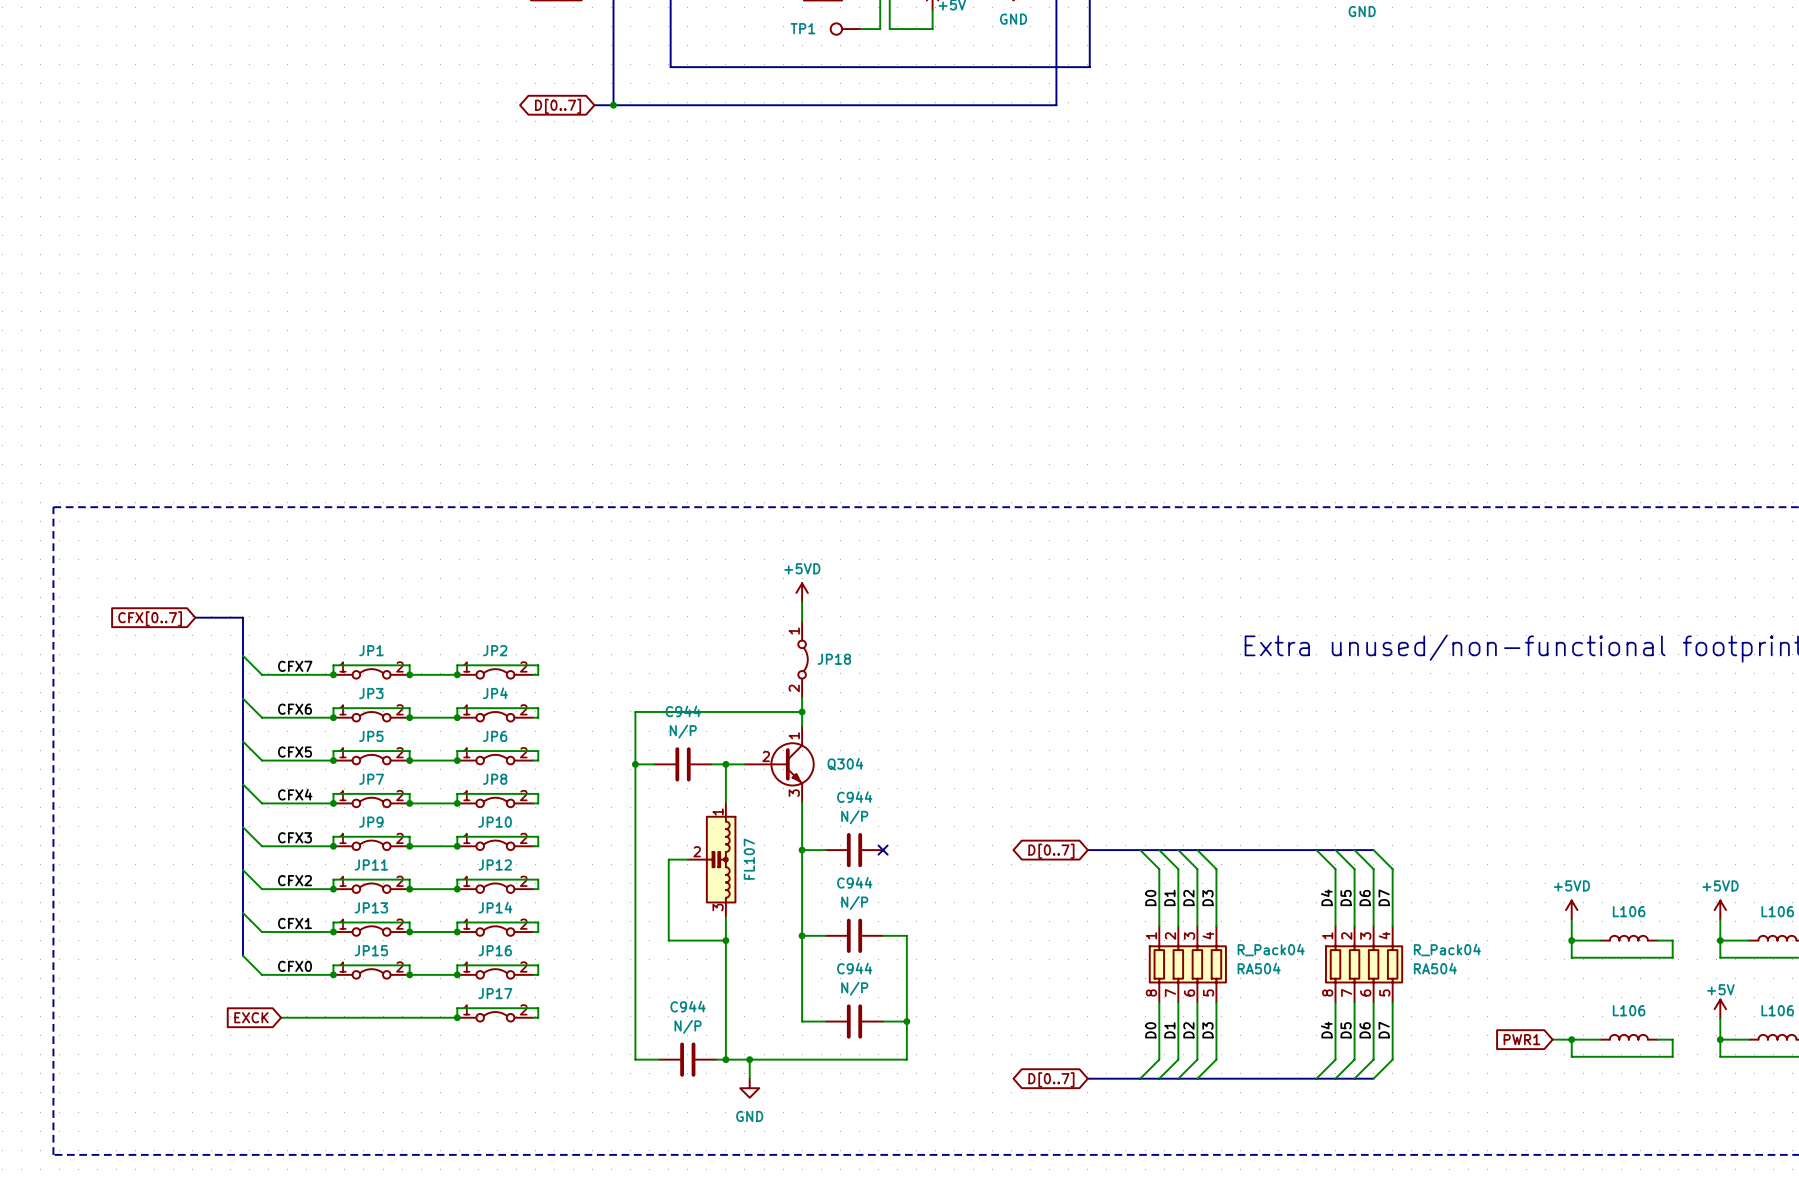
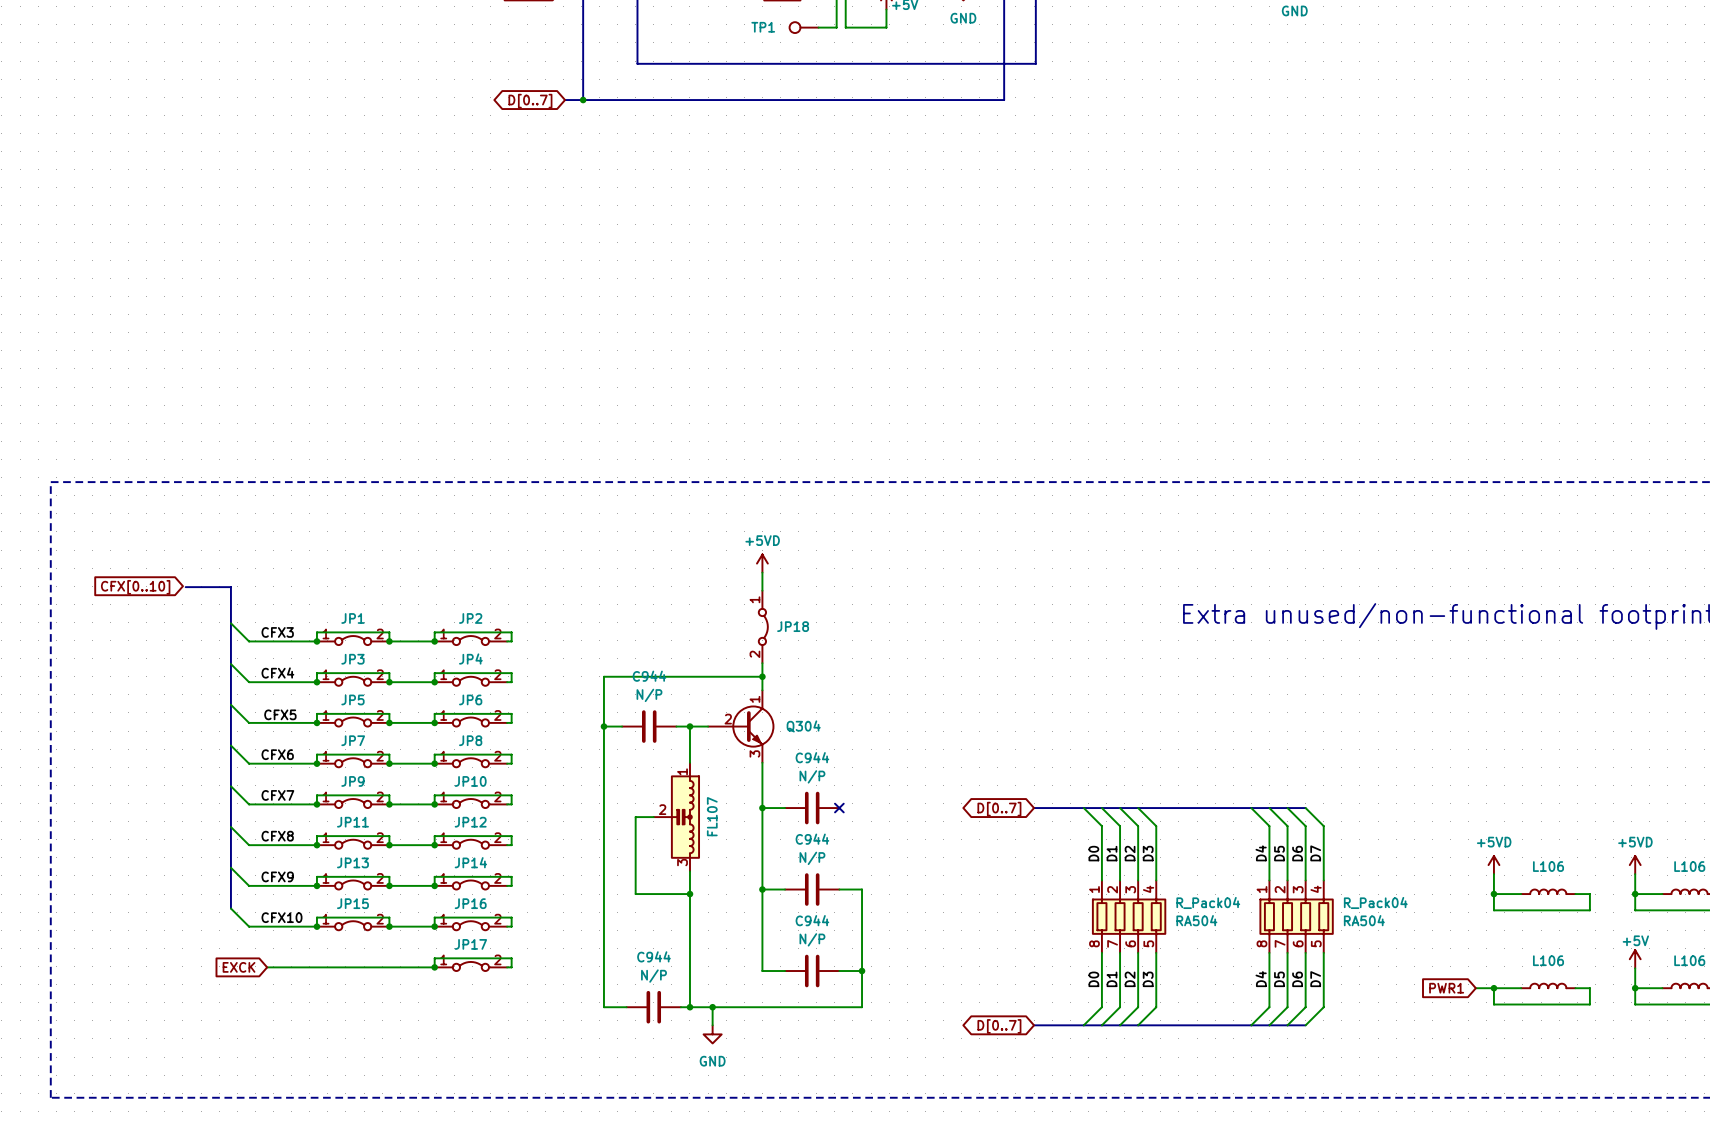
global label: CFX[0..7] (150, 618) -> CFX[0..10] (135, 587)
label: CFX7 (295, 666) -> CFX3 (277, 632)
label: CFX6 (294, 709) -> CFX4 (277, 672)
label: CFX4 (295, 794) -> CFX6 (277, 754)
label: CFX3 (294, 837) -> CFX7 (277, 795)
label: CFX2 (294, 880) -> CFX8 (277, 836)
label: CFX1 (294, 923) -> CFX9 (277, 876)
label: CFX0 (294, 966) -> CFX10 (281, 917)

